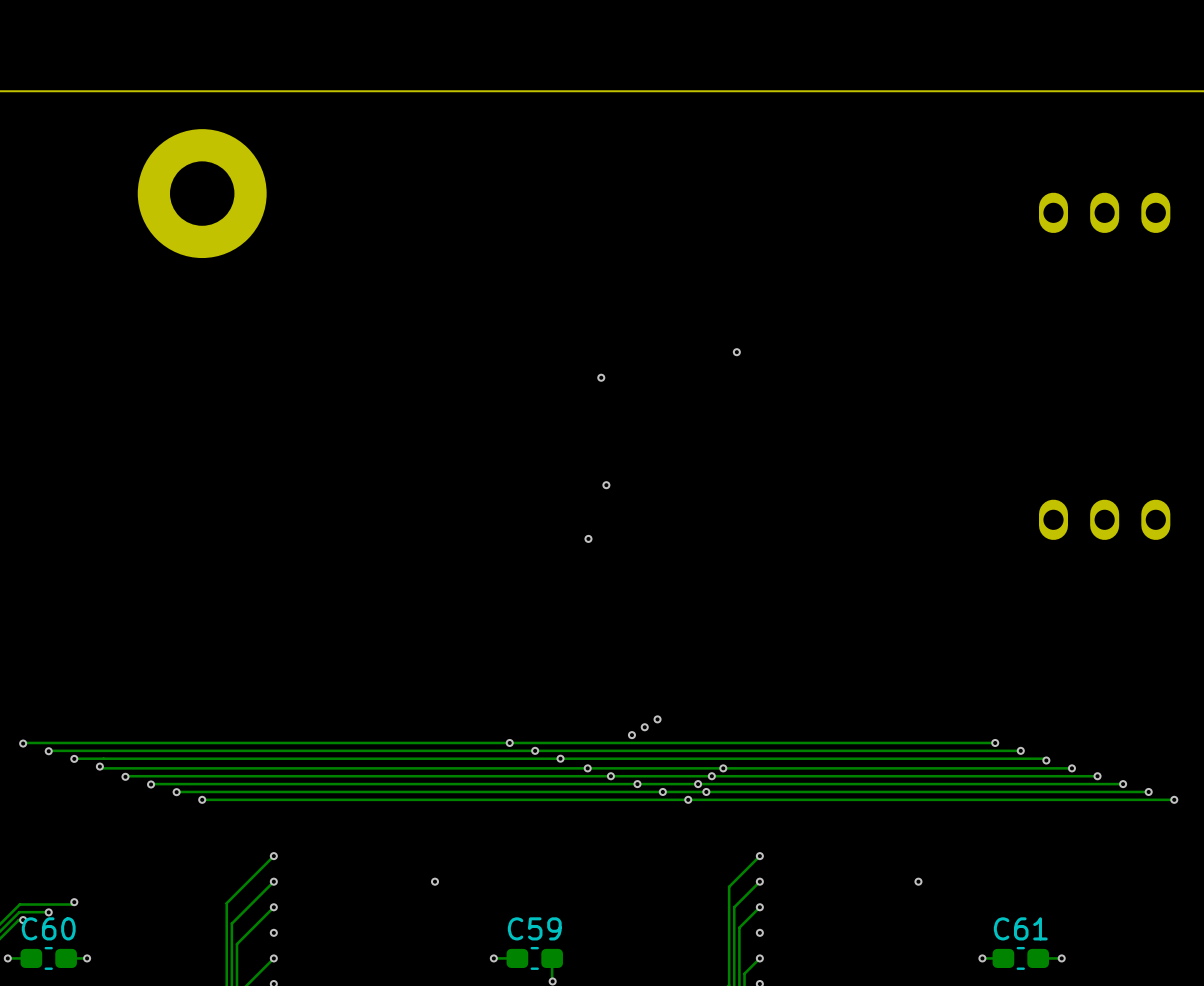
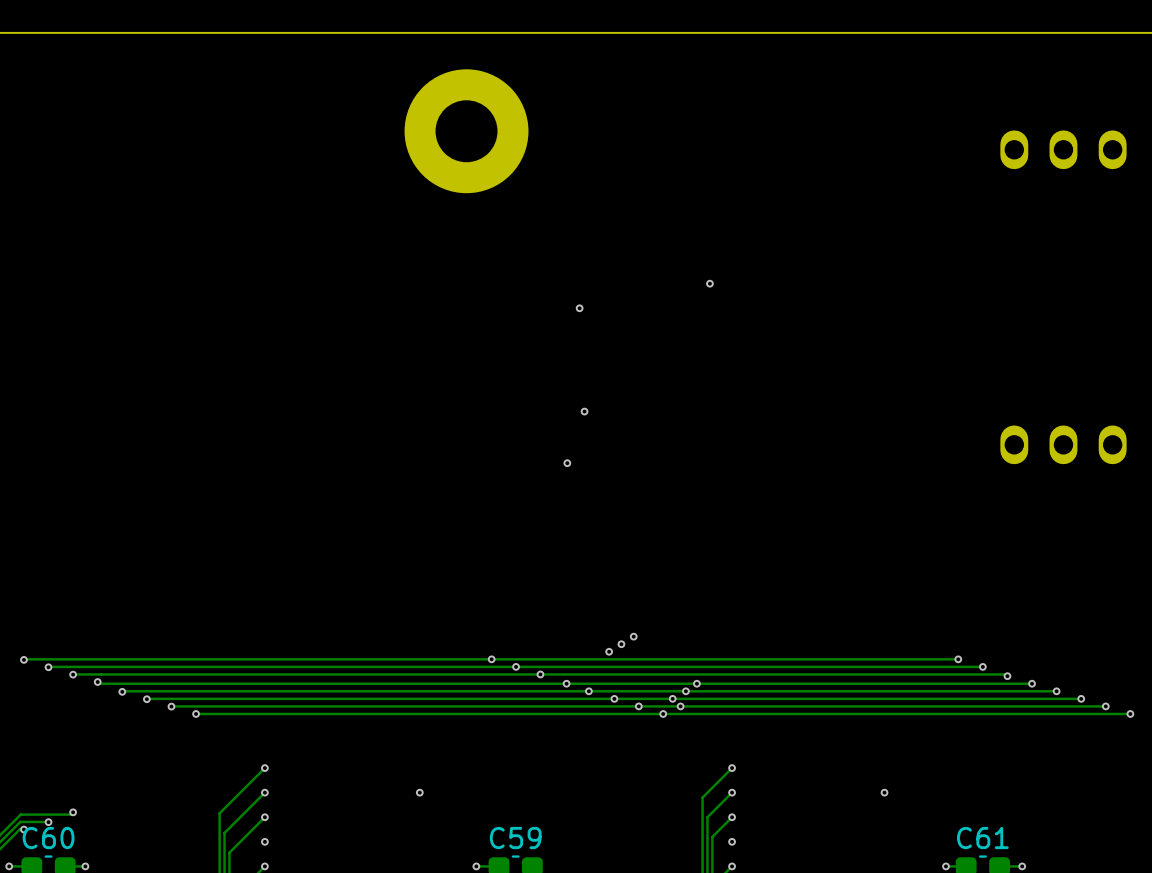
part position: (202, 193) -> (466, 131)

